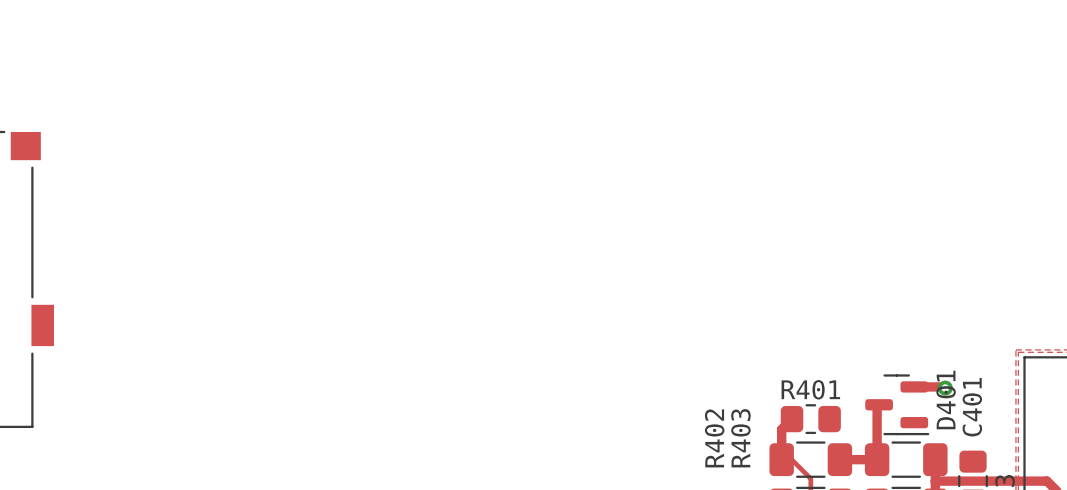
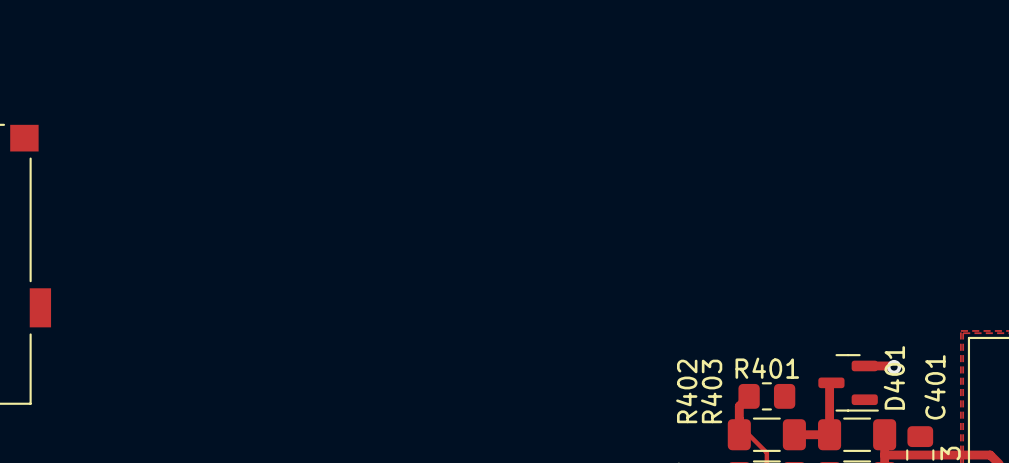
C401 name position: C401 (972, 407) -> C401 (934, 387)
R402 name position: R402 (714, 438) -> R402 (686, 391)
R403 name position: R403 (740, 438) -> R403 (711, 391)

